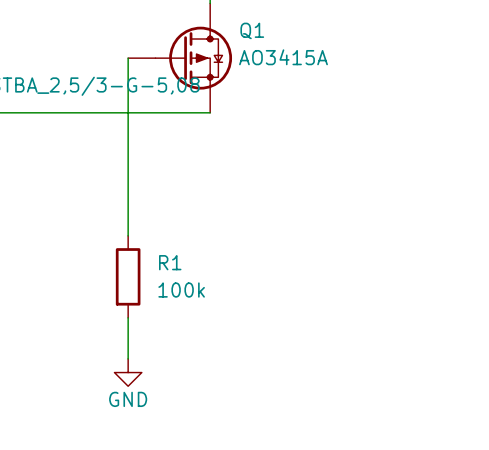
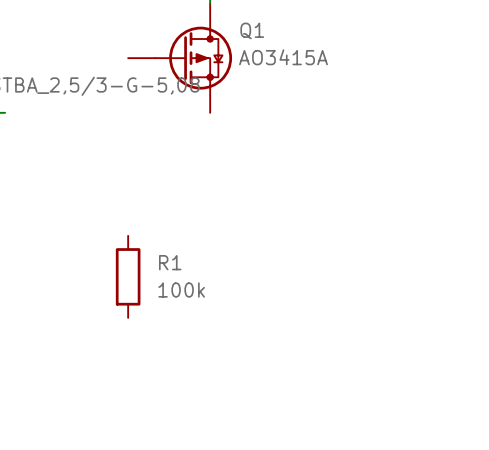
wire: (128, 58) (128, 235) -> none
wire: (5, 112) (210, 112) -> none
wire: (128, 317) (128, 358) -> none
power symbol: GND (128, 372) -> none

